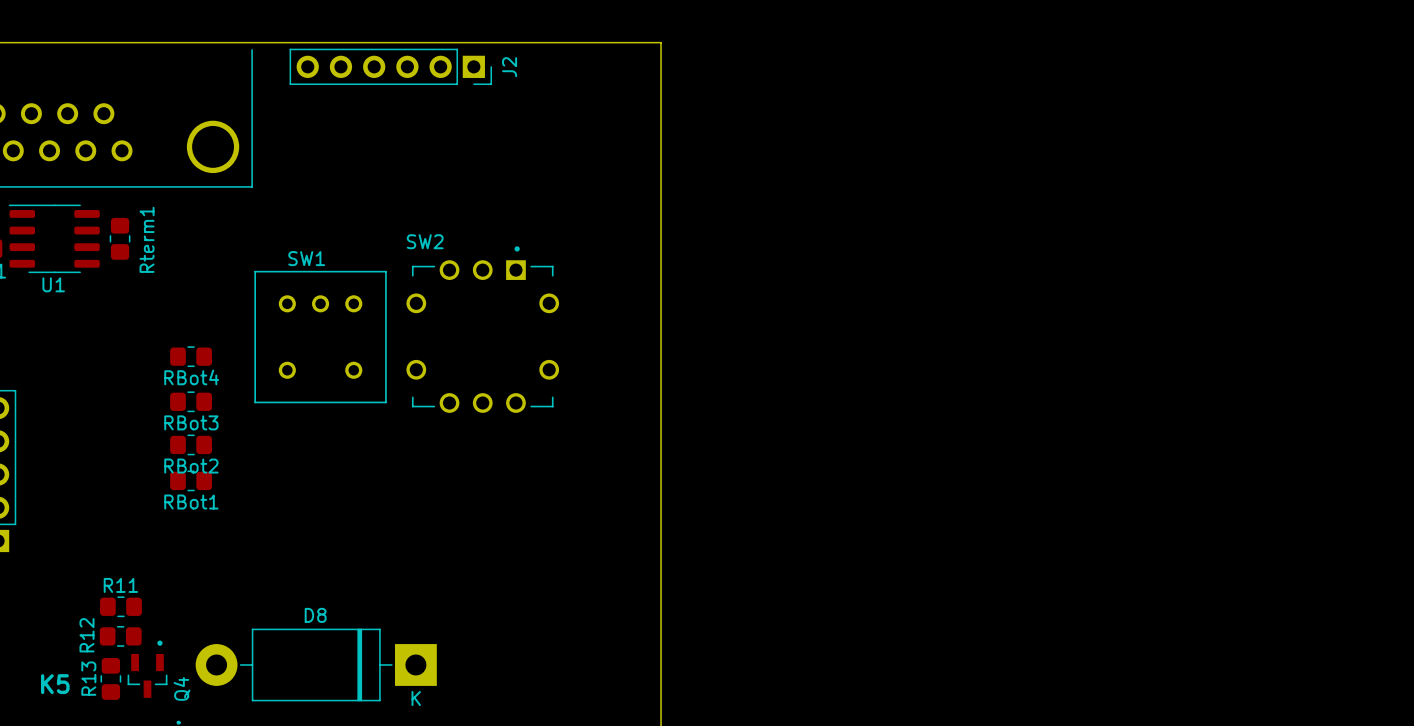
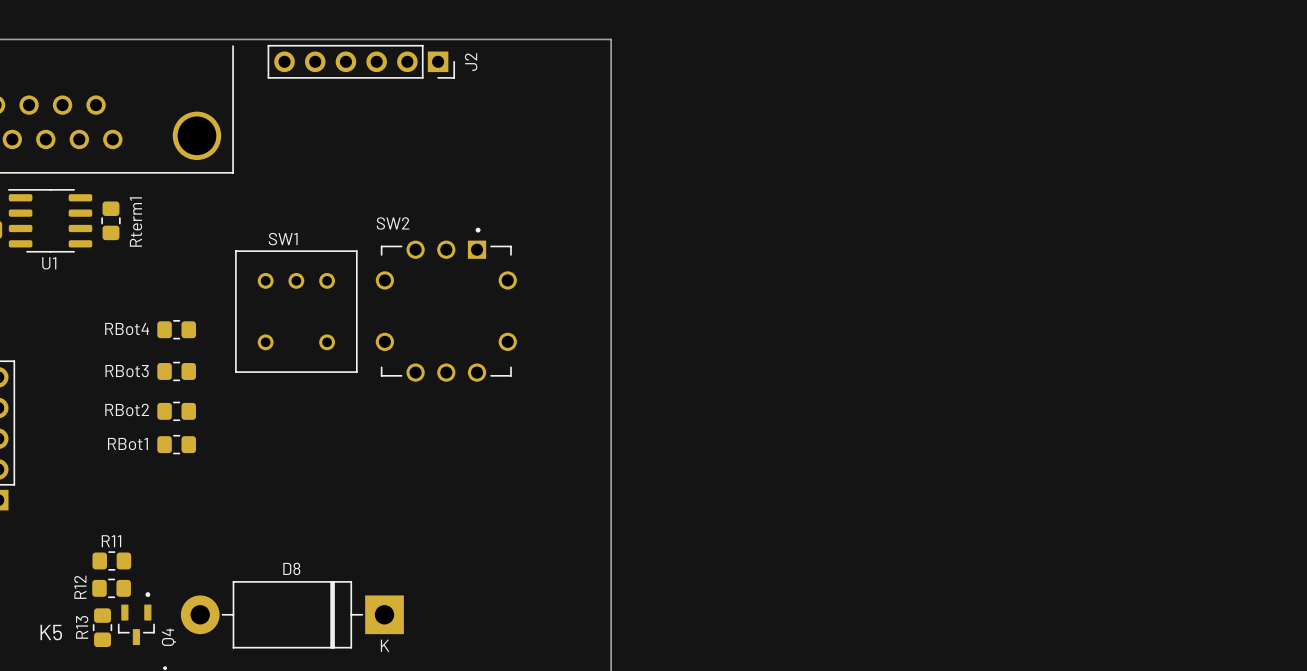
RBot4 name position: RBot4 (191, 377) -> RBot4 (127, 329)
RBot3 name position: RBot3 (191, 422) -> RBot3 (127, 371)
RBot2 name position: RBot2 (191, 466) -> RBot2 (127, 409)
RBot1 name position: RBot1 (191, 502) -> RBot1 (127, 444)

